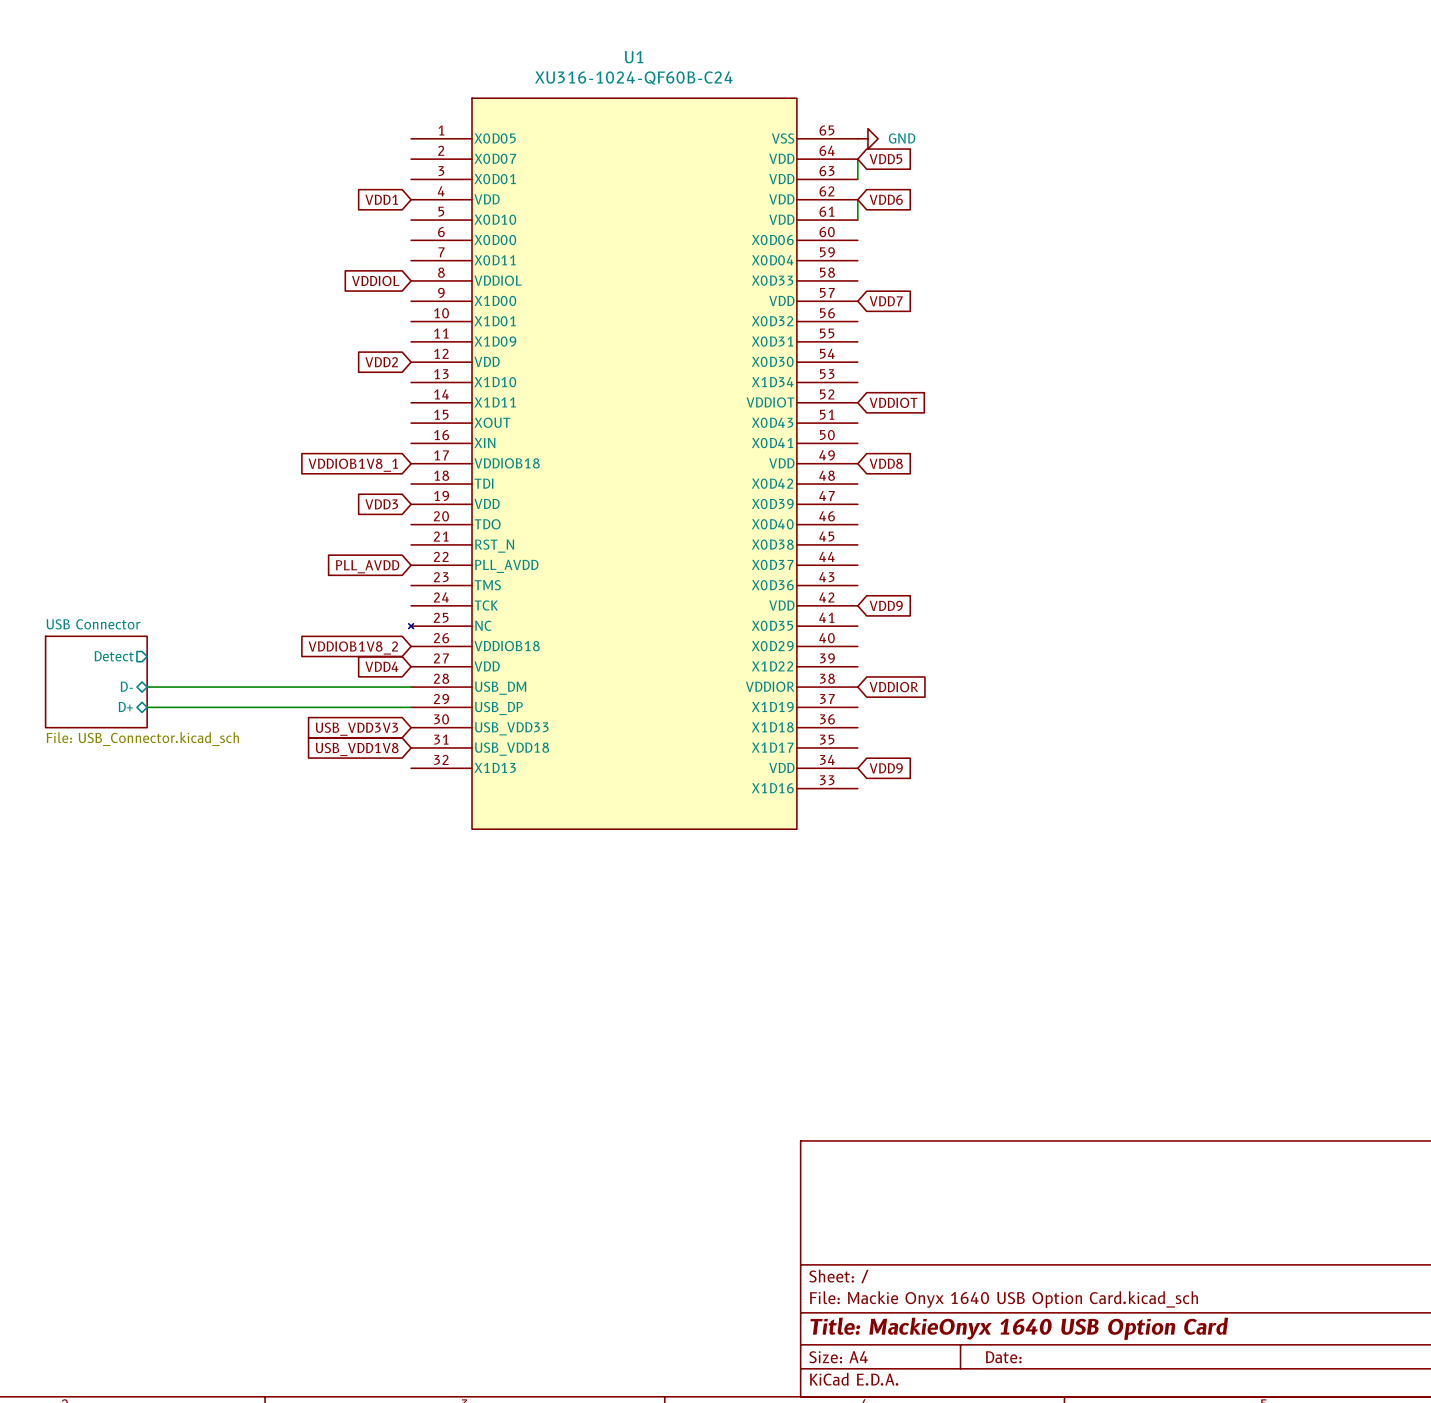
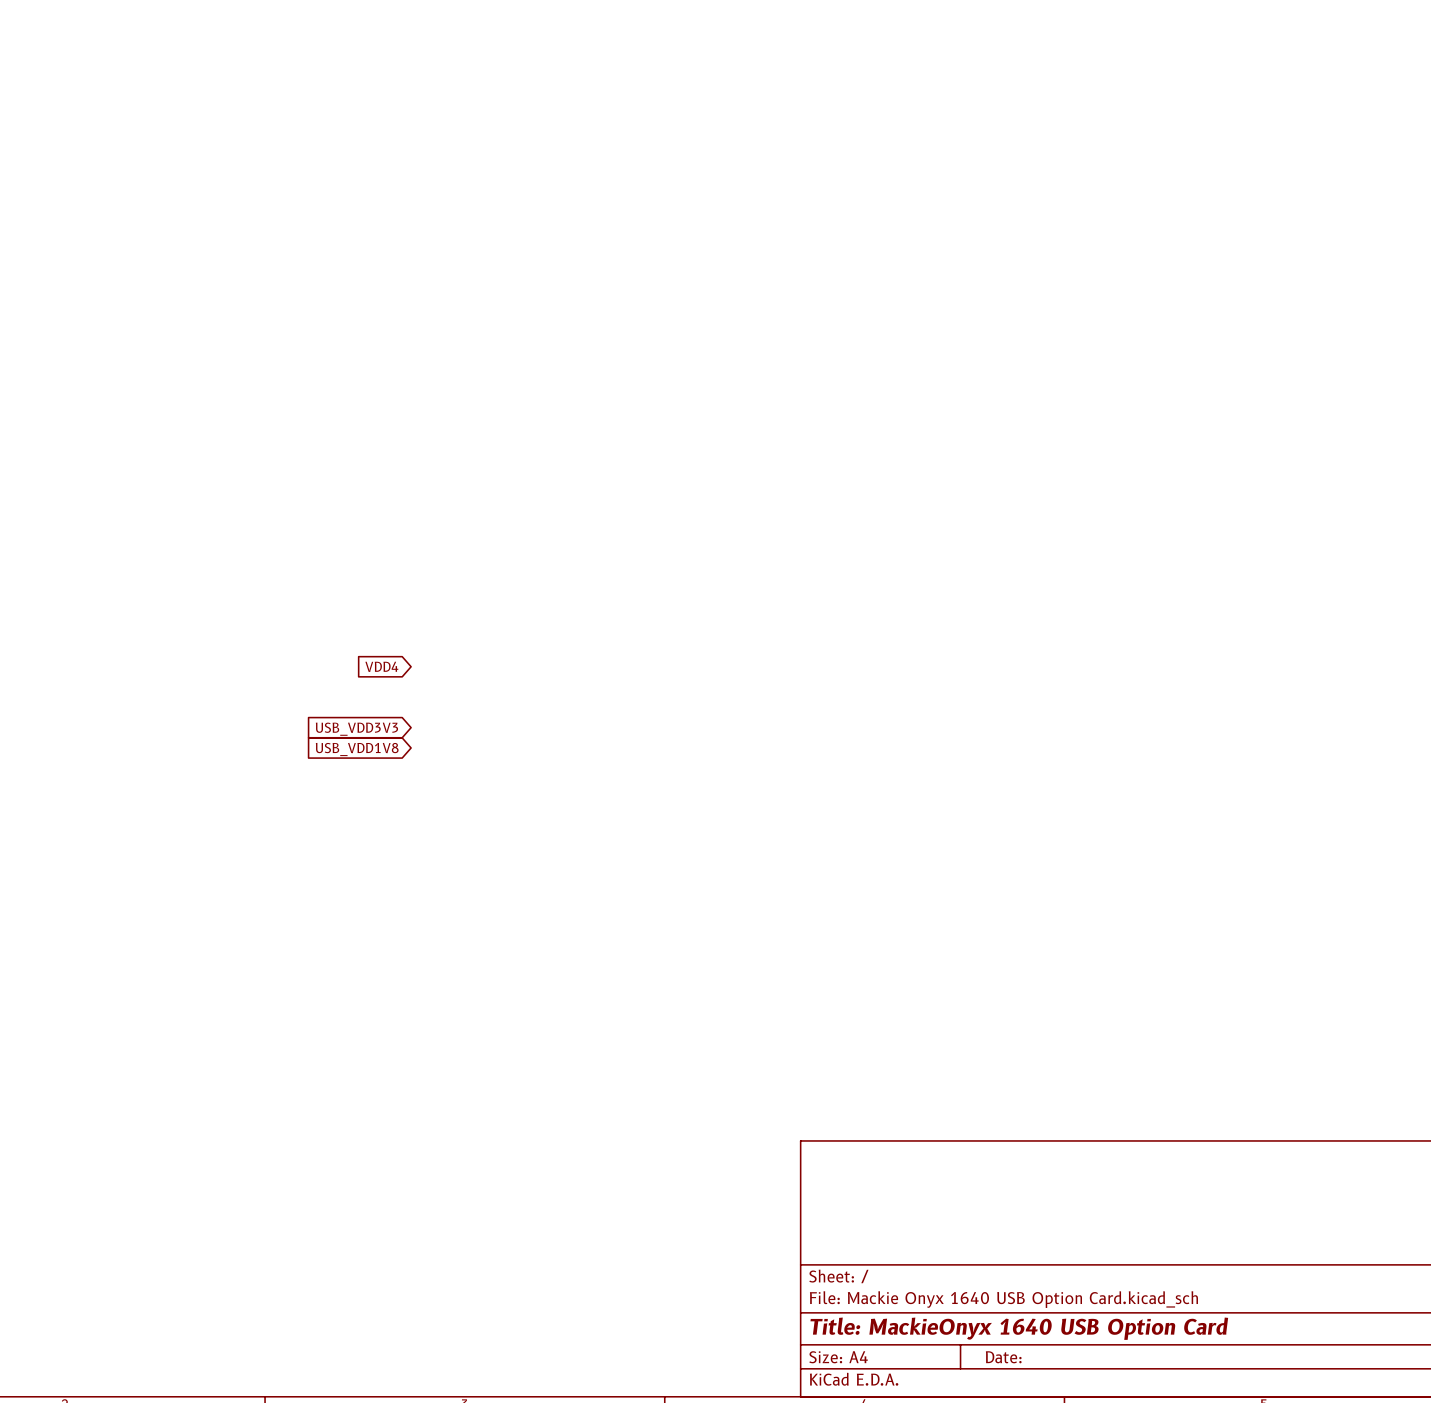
power symbol: GND (867, 138) -> none
wire: (857, 159) (857, 179) -> none
global label: VDD5 (885, 159) -> none
global label: VDD1 (381, 199) -> none
wire: (857, 199) (857, 220) -> none
global label: VDD6 (886, 199) -> none
global label: VDDIOL (375, 281) -> none
global label: VDD7 (886, 301) -> none
global label: VDD2 (381, 362) -> none
global label: VDDIOT (893, 402) -> none
U1: XU316-1024-QF60B-C24 (633, 463) -> none
global label: VDD8 (886, 463) -> none
global label: VDDIOB1V8_1 (353, 465) -> none
global label: VDD3 (381, 504) -> none
global label: PLL_AVDD (367, 566) -> none
global label: VDD9 (886, 605) -> none
global label: VDDIOB1V8_2 (353, 647) -> none
sheet pin: Detect (114, 656) -> none
sheet USB Connector: File: USB_Connector.kicad_sch (96, 681) -> none
sheet pin: D- (126, 686) -> none
wire: (147, 687) (411, 687) -> none
global label: VDDIOR (893, 687) -> none
sheet pin: D+ (125, 707) -> none
wire: (147, 707) (411, 707) -> none
global label: VDD9 (886, 768) -> none

